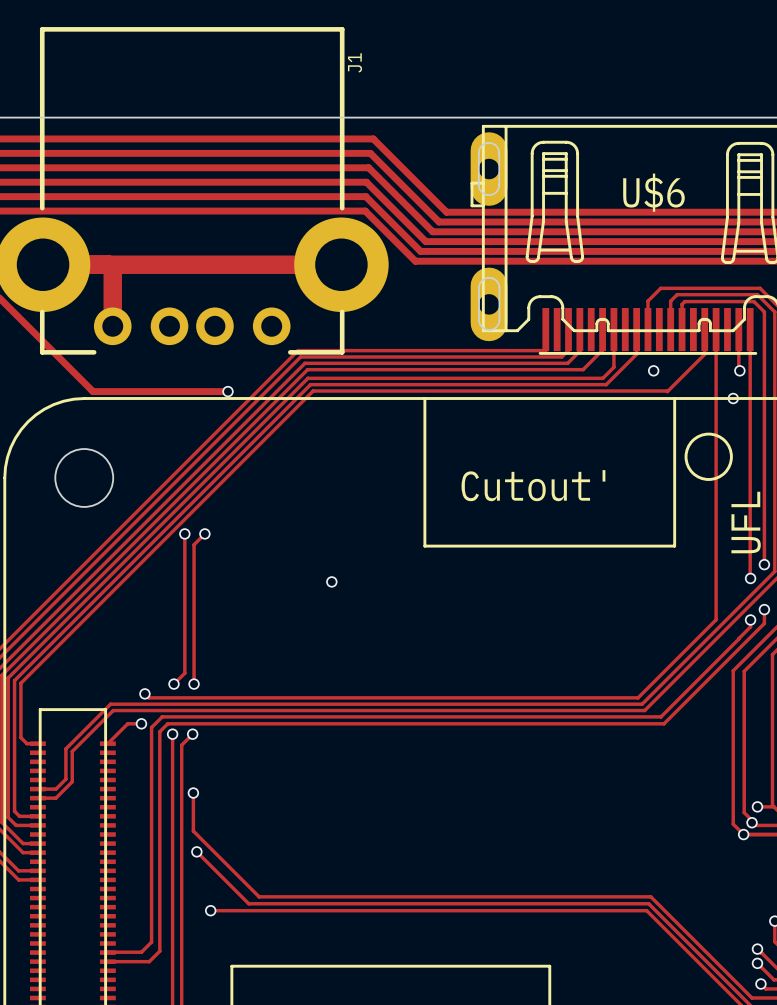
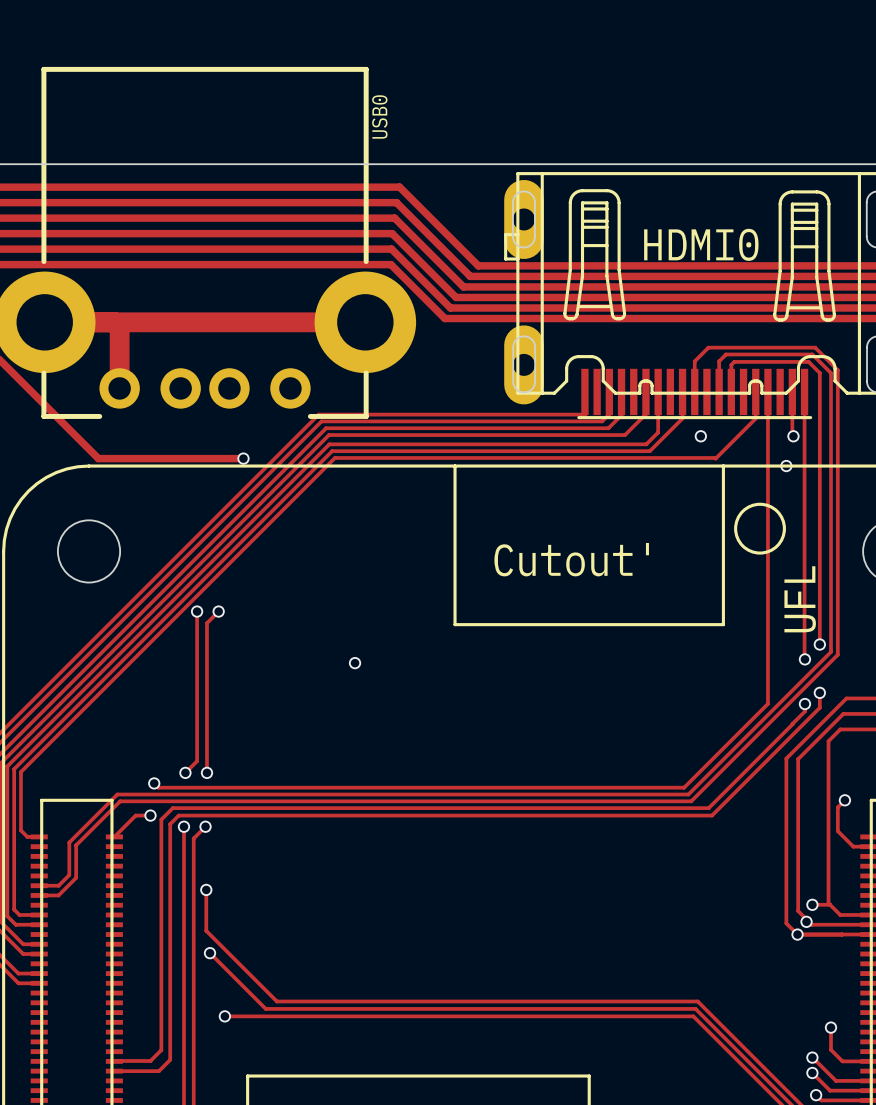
J1 name: J1 (355, 62) -> USB0 (379, 116)
U$6 name: U$6 (653, 192) -> HDMI0 (701, 244)

